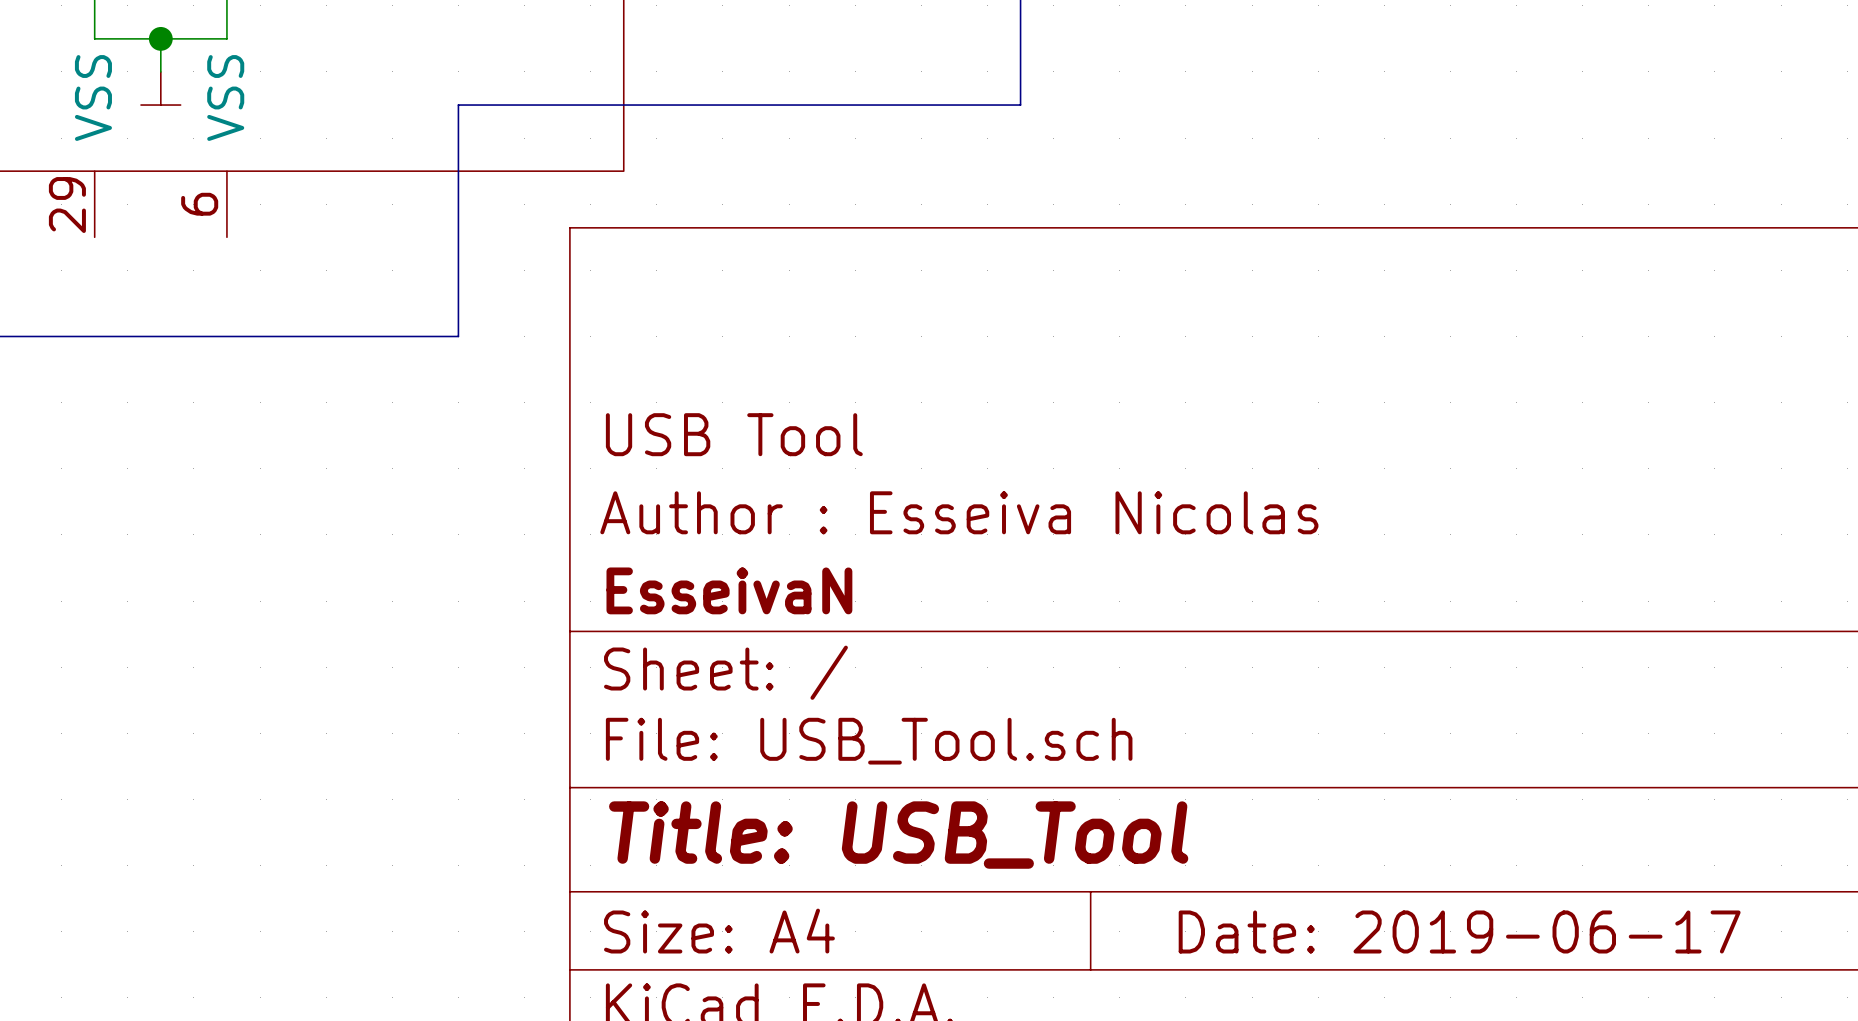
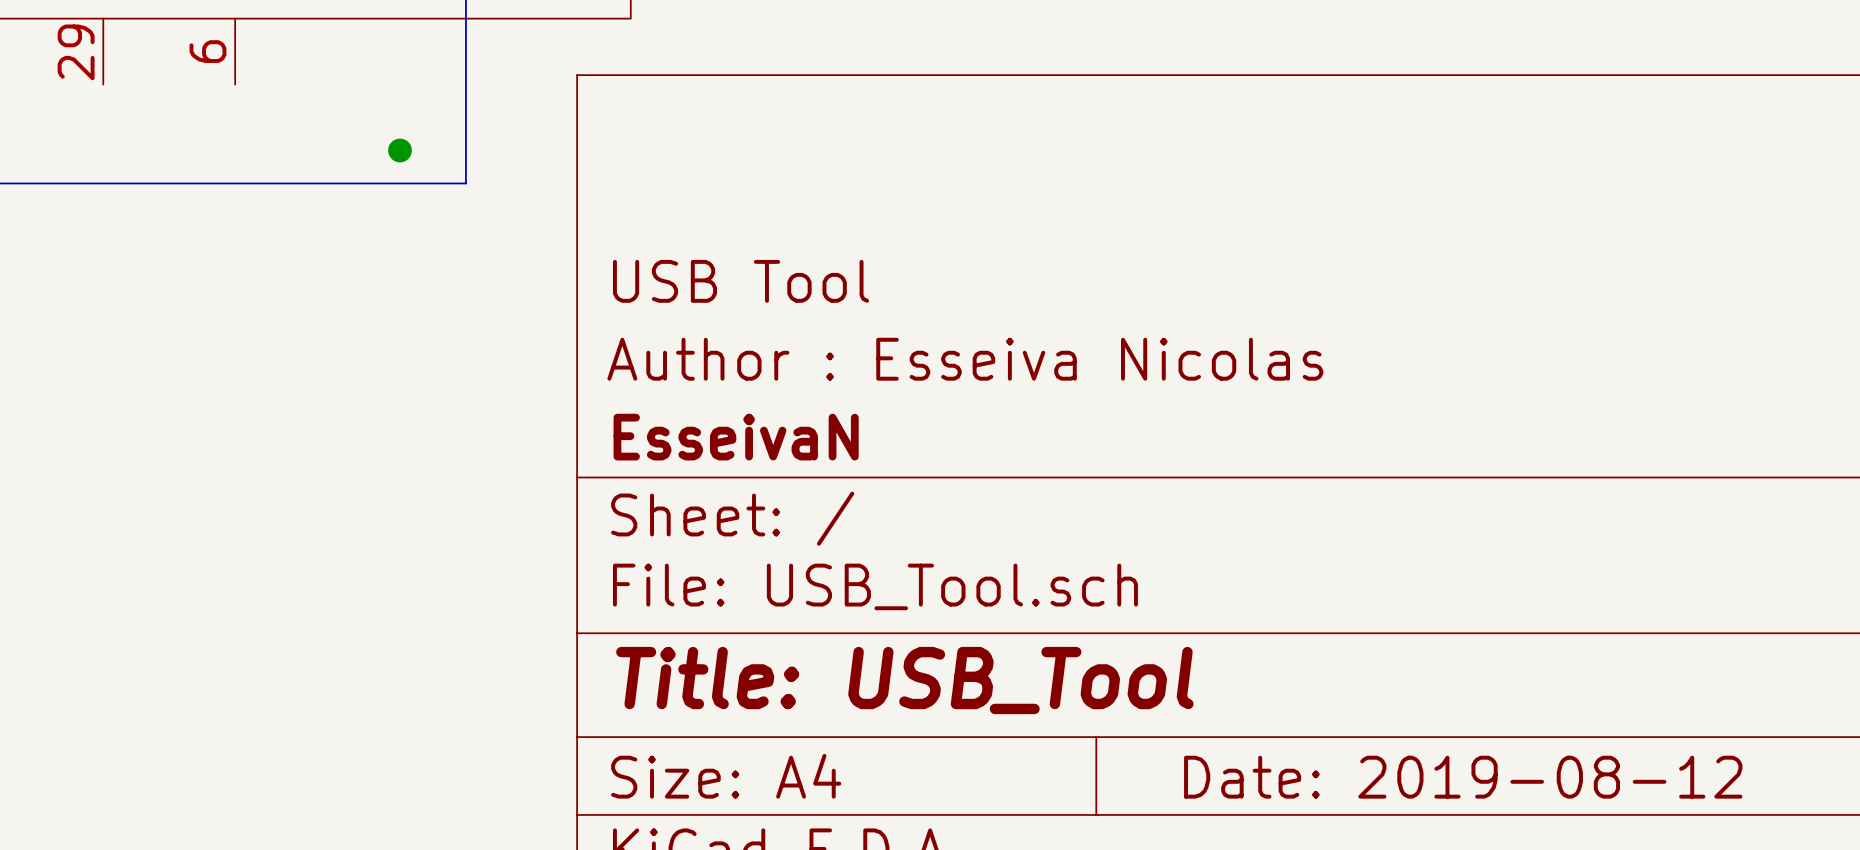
junction: none -> (400, 150)
title block: Date: 2019-06-17 (1459, 931) -> Date: 2019-08-12 (1463, 777)

